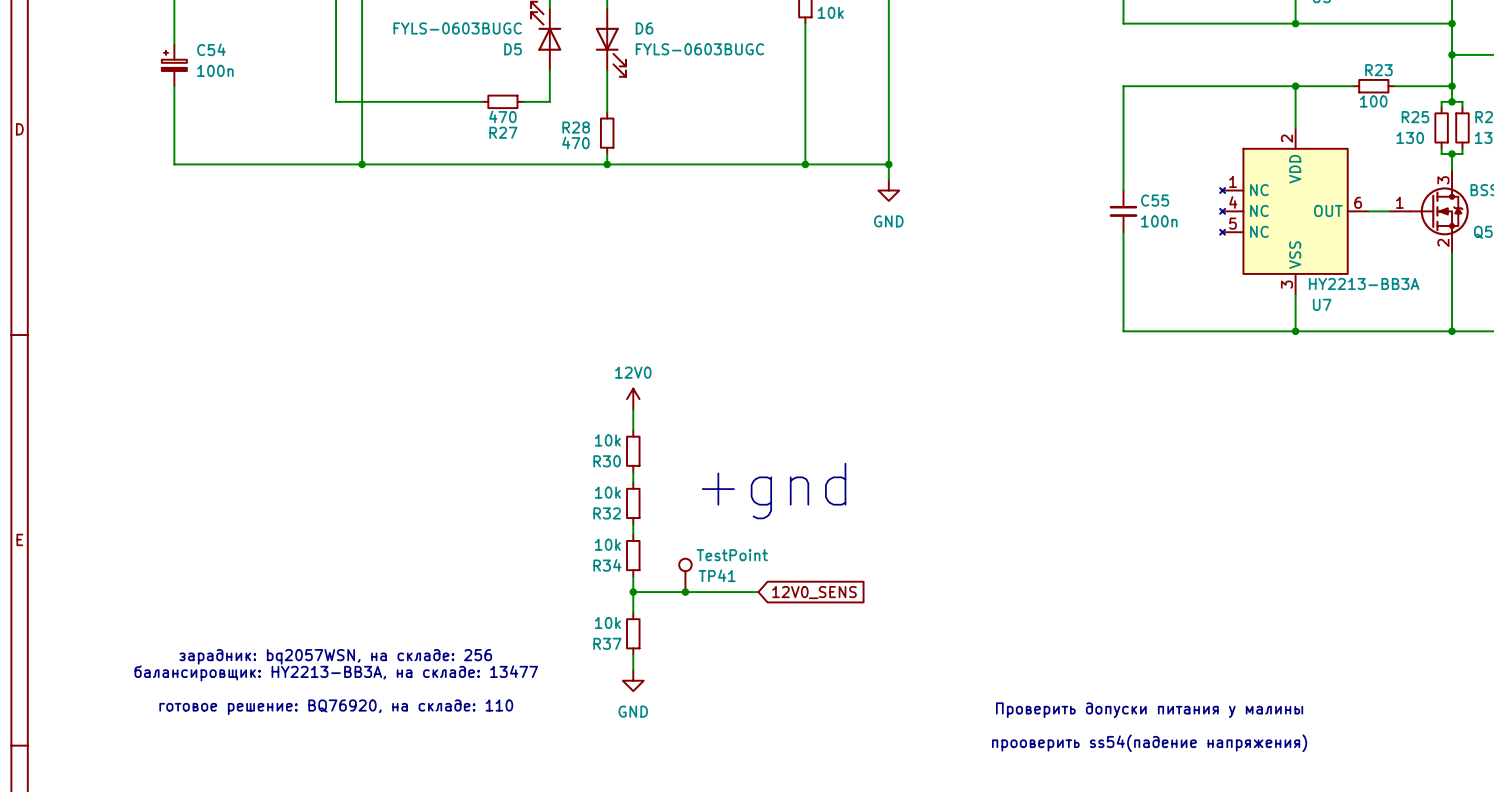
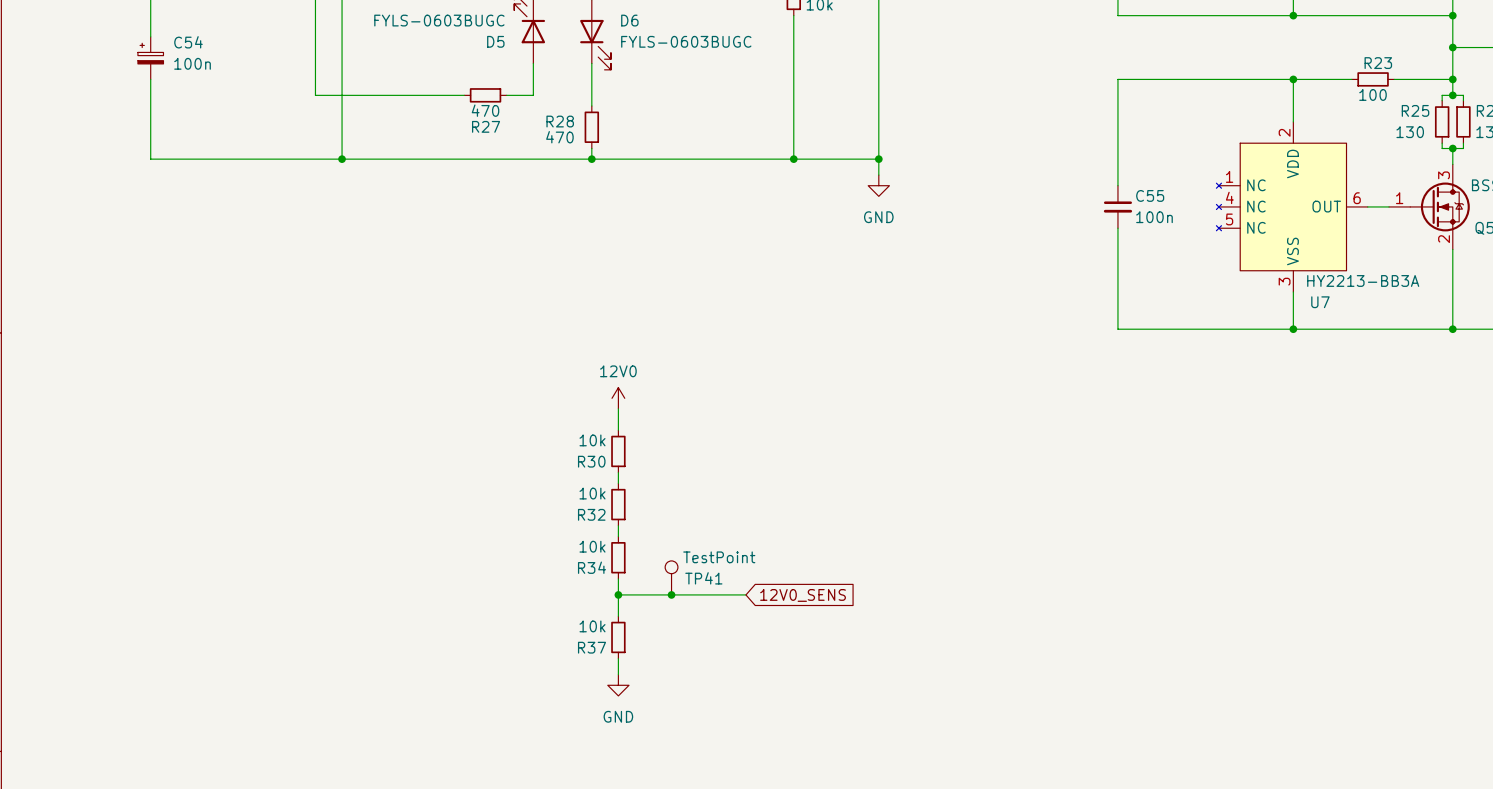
text: +gnd (774, 491) -> none
text: зарадник: bq2057WSN, на складе: 256 (335, 656) -> none
text: балансировщик: HY2213-BB3A, на складе: 13477 (336, 673) -> none
text: готовое решение: BQ76920, на складе: 110 (336, 707) -> none
text: Проверить допуски питания у малины (1149, 710) -> none
text: прооверить ss54(падение напряжения) (1149, 743) -> none

